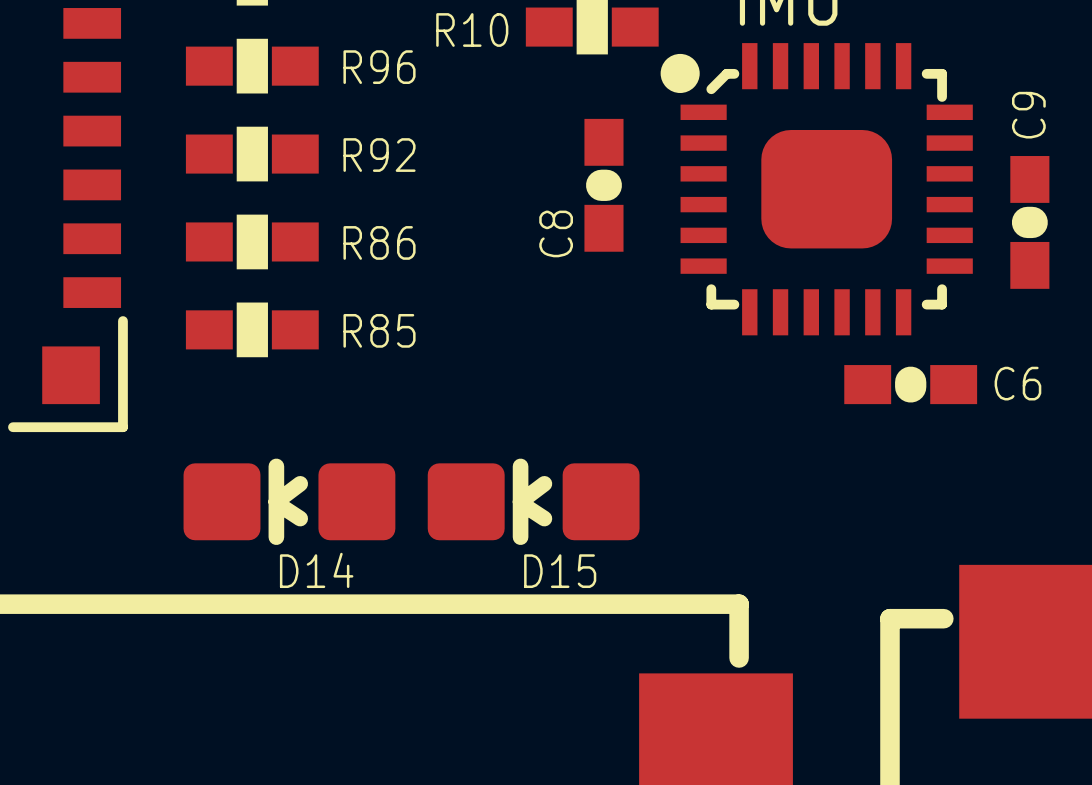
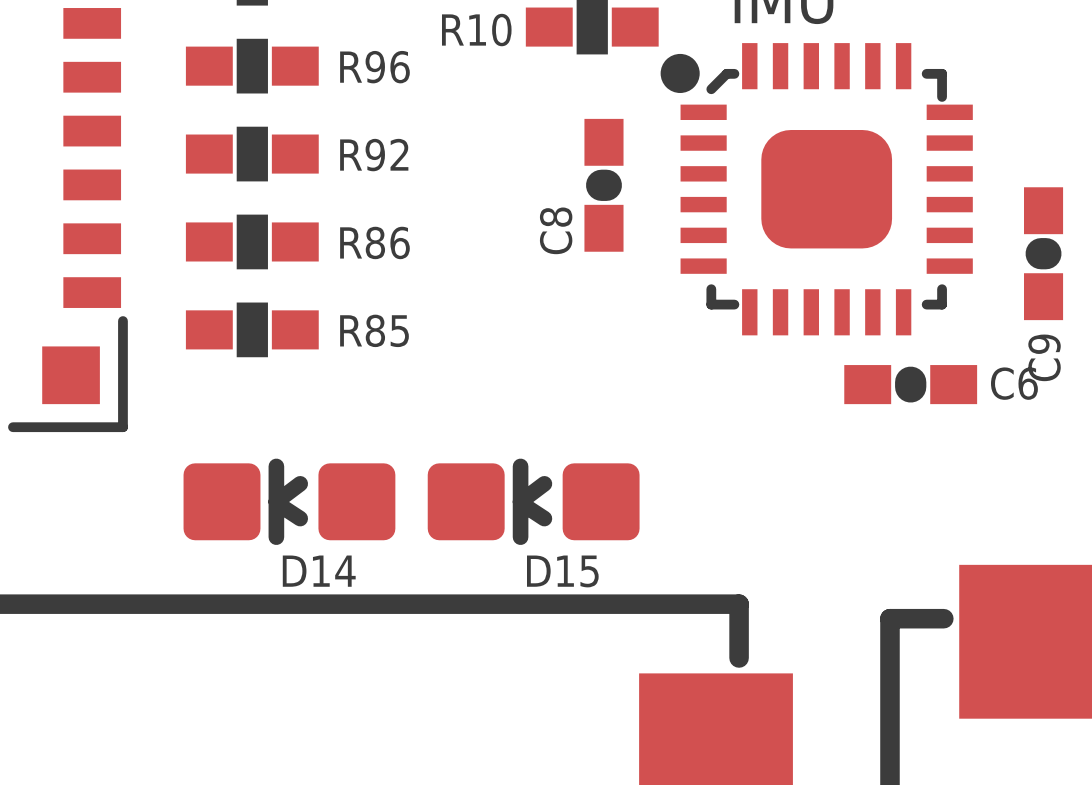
C9 name position: C9 (1028, 115) -> C9 (1044, 357)
C9 position: (1029, 222) -> (1043, 253)

